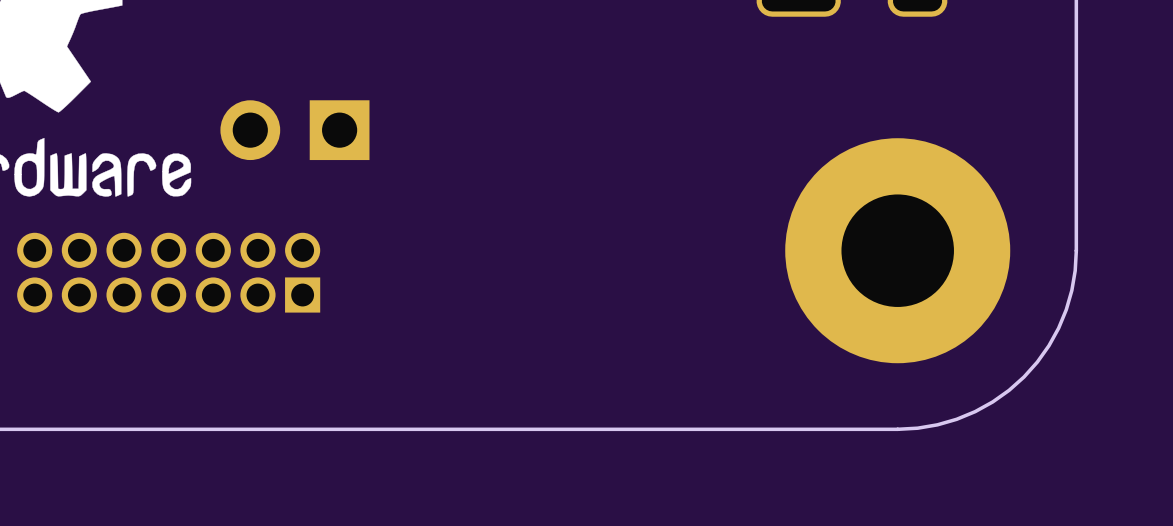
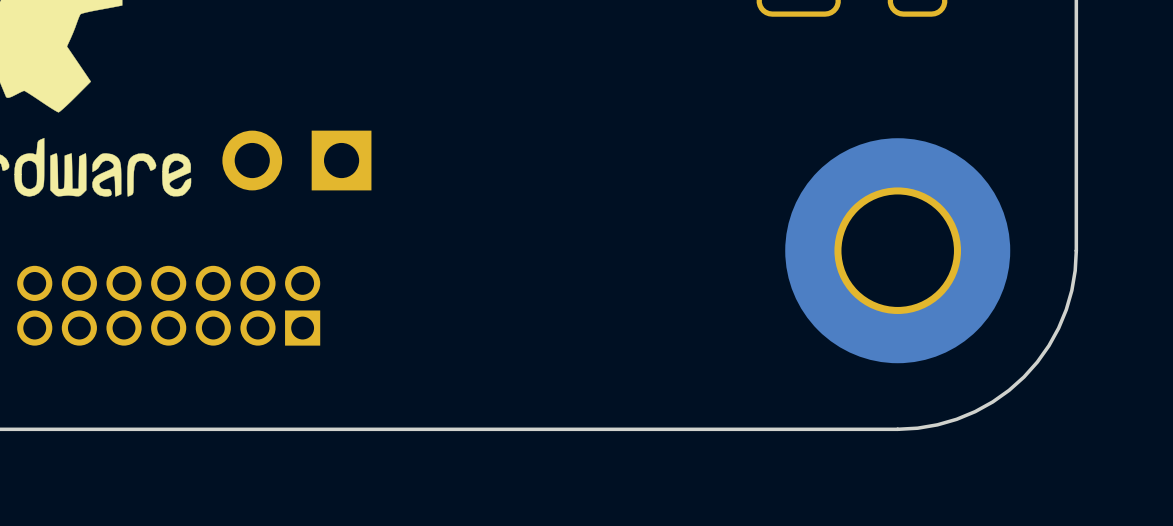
part position: (294, 130) -> (296, 160)
part position: (168, 272) -> (168, 305)

